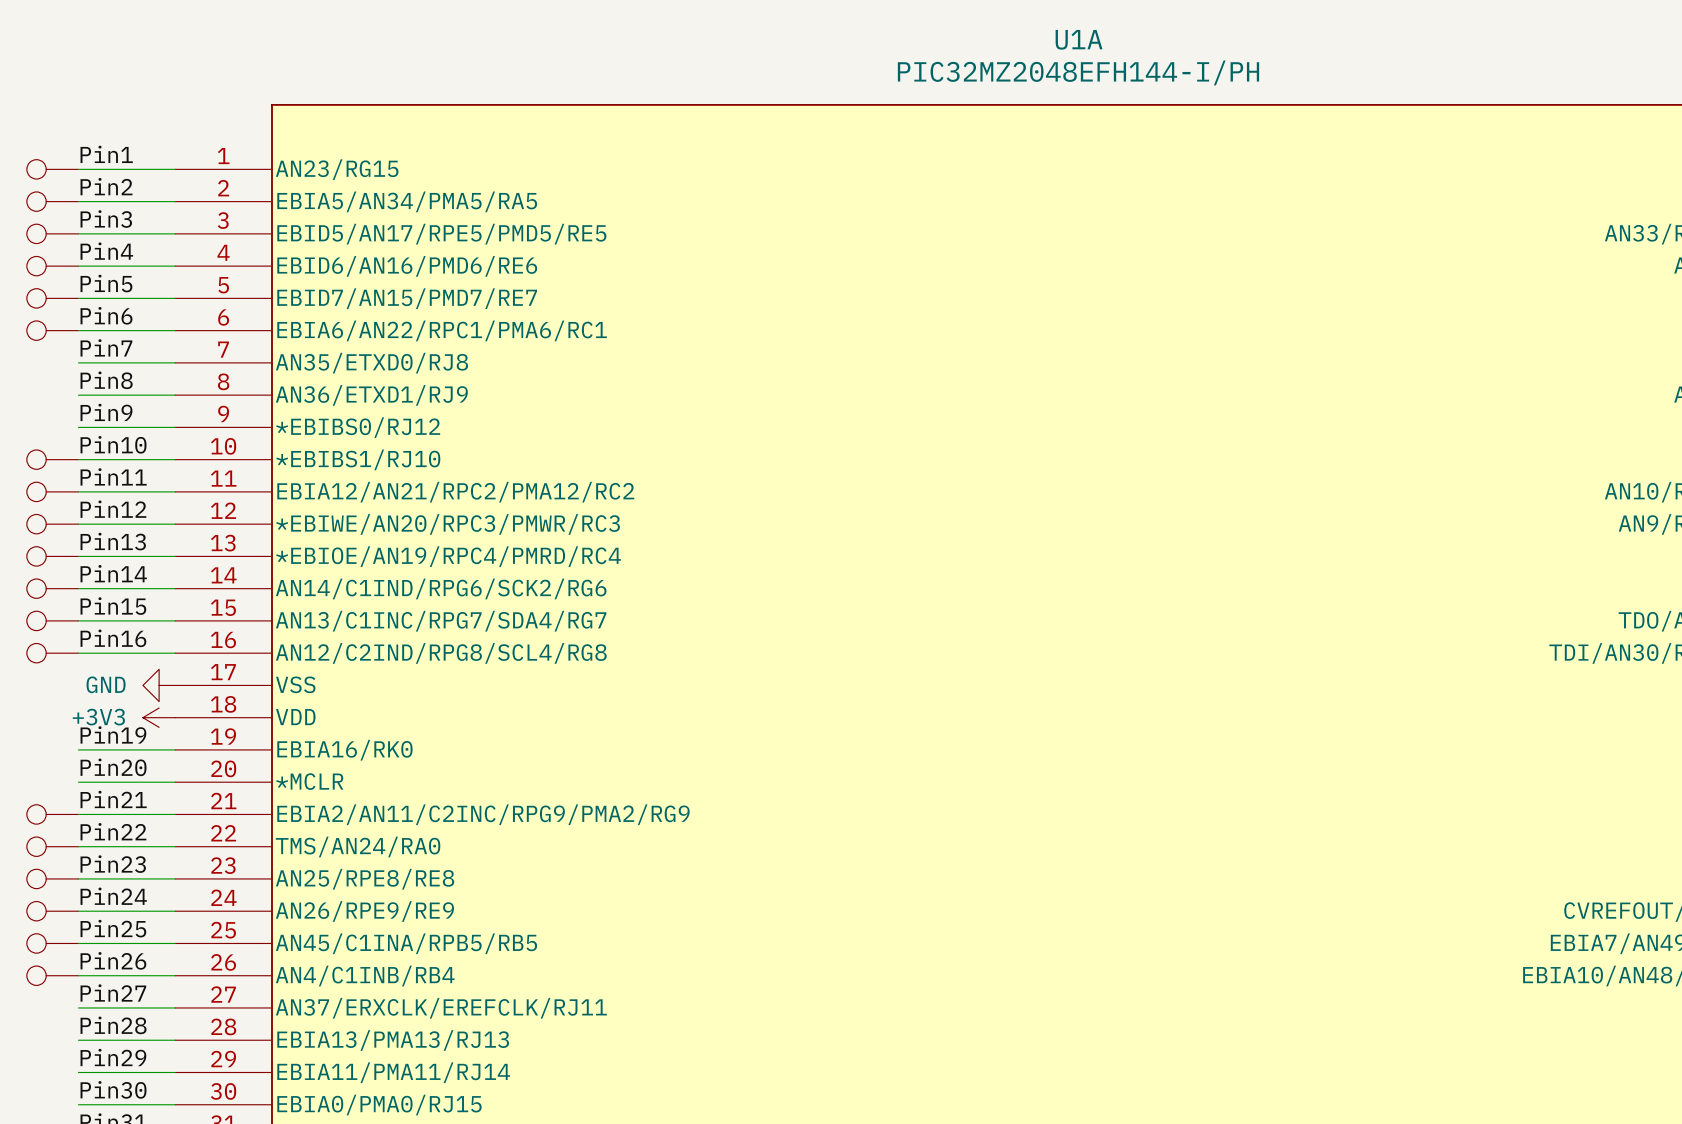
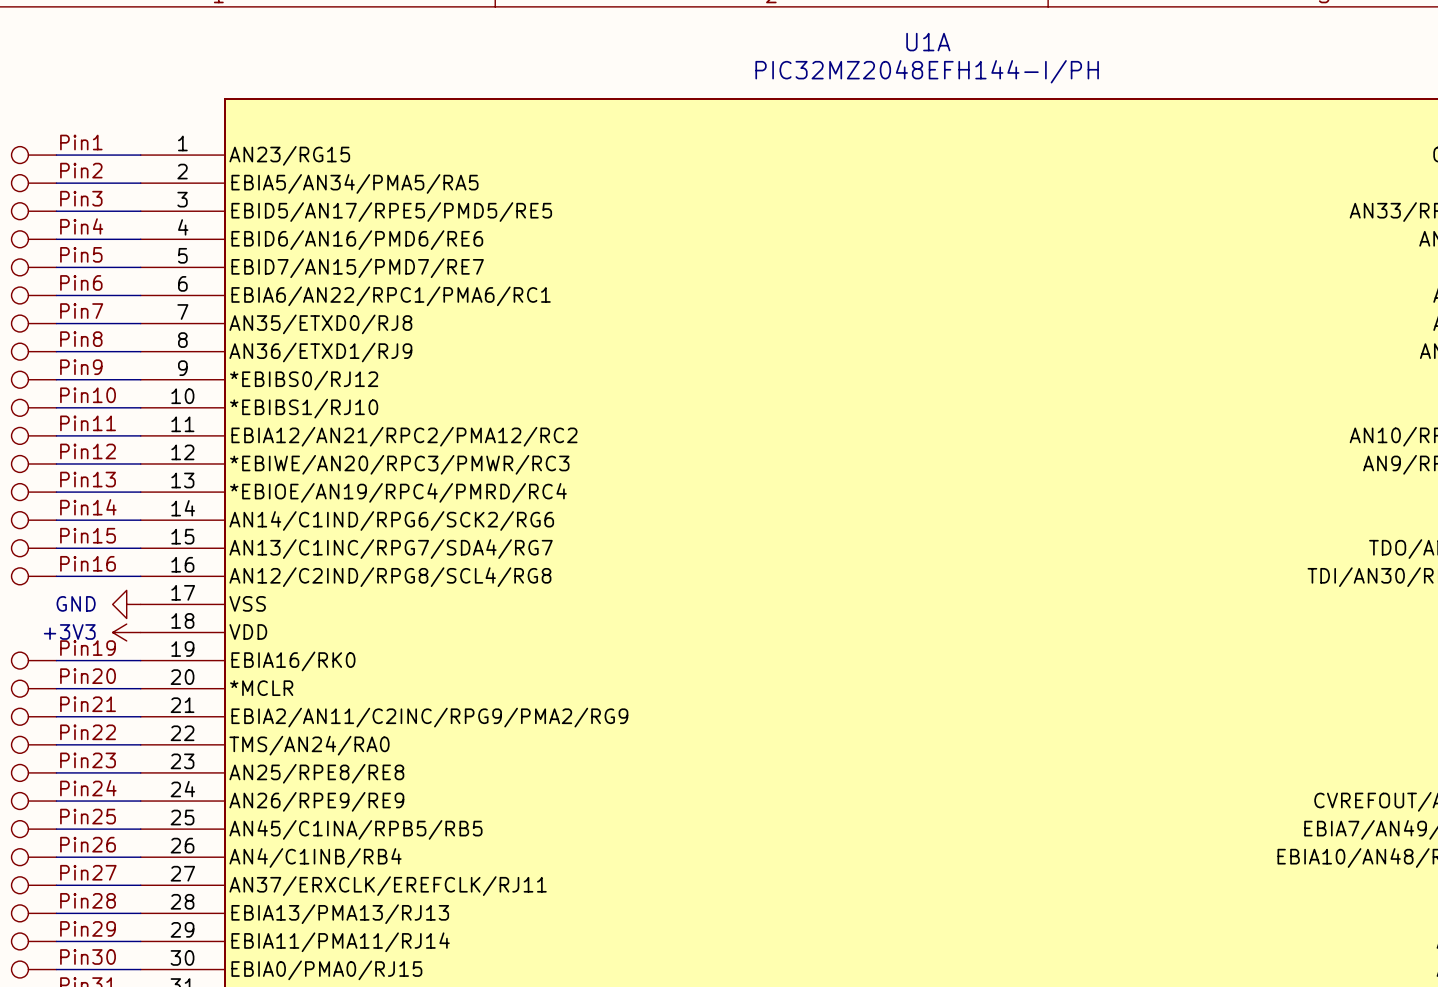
part: none -> (34, 323)
part: none -> (34, 351)
part: none -> (34, 379)
part: none -> (34, 660)
part: none -> (34, 688)
part: none -> (34, 885)
part: none -> (34, 913)
part: none -> (34, 941)
part: none -> (34, 969)

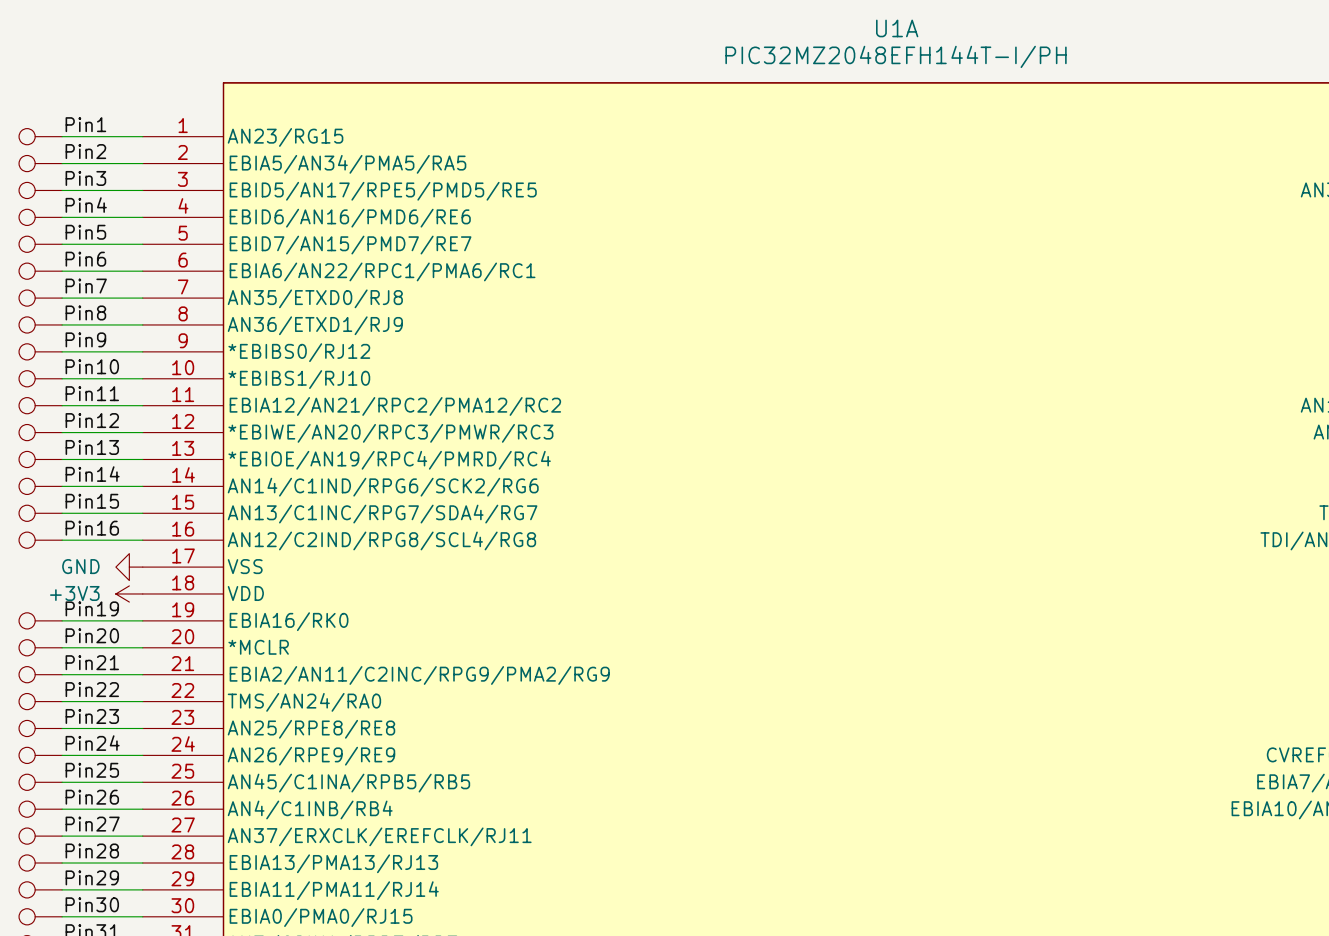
U1A value: PIC32MZ2048EFH144-I/PH (927, 71) -> PIC32MZ2048EFH144T-I/PH (896, 56)

